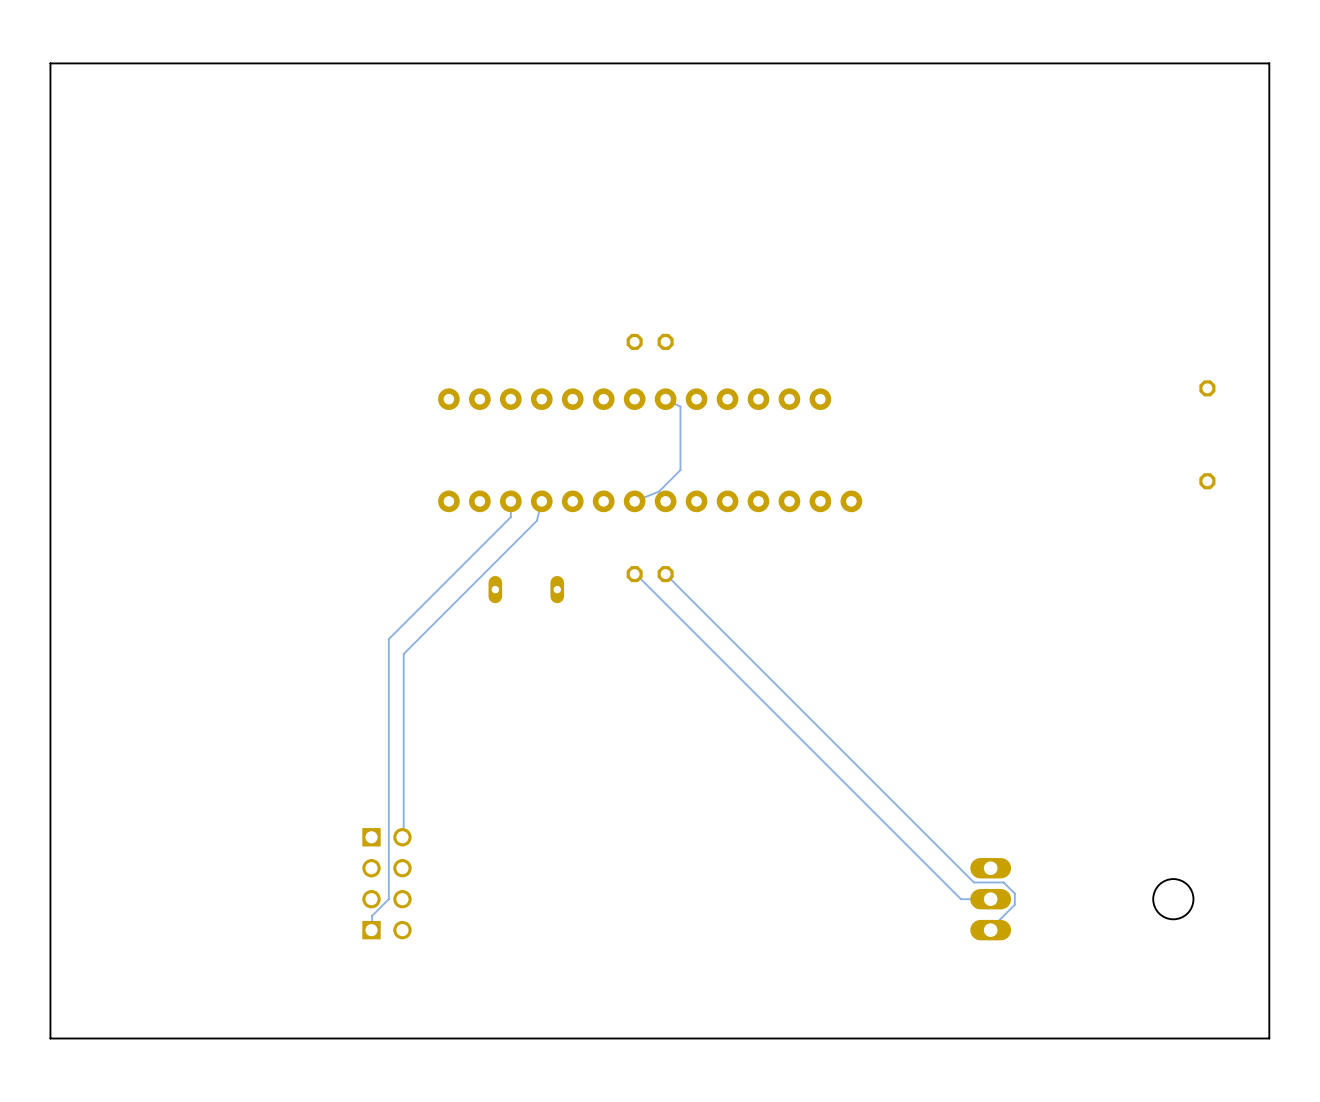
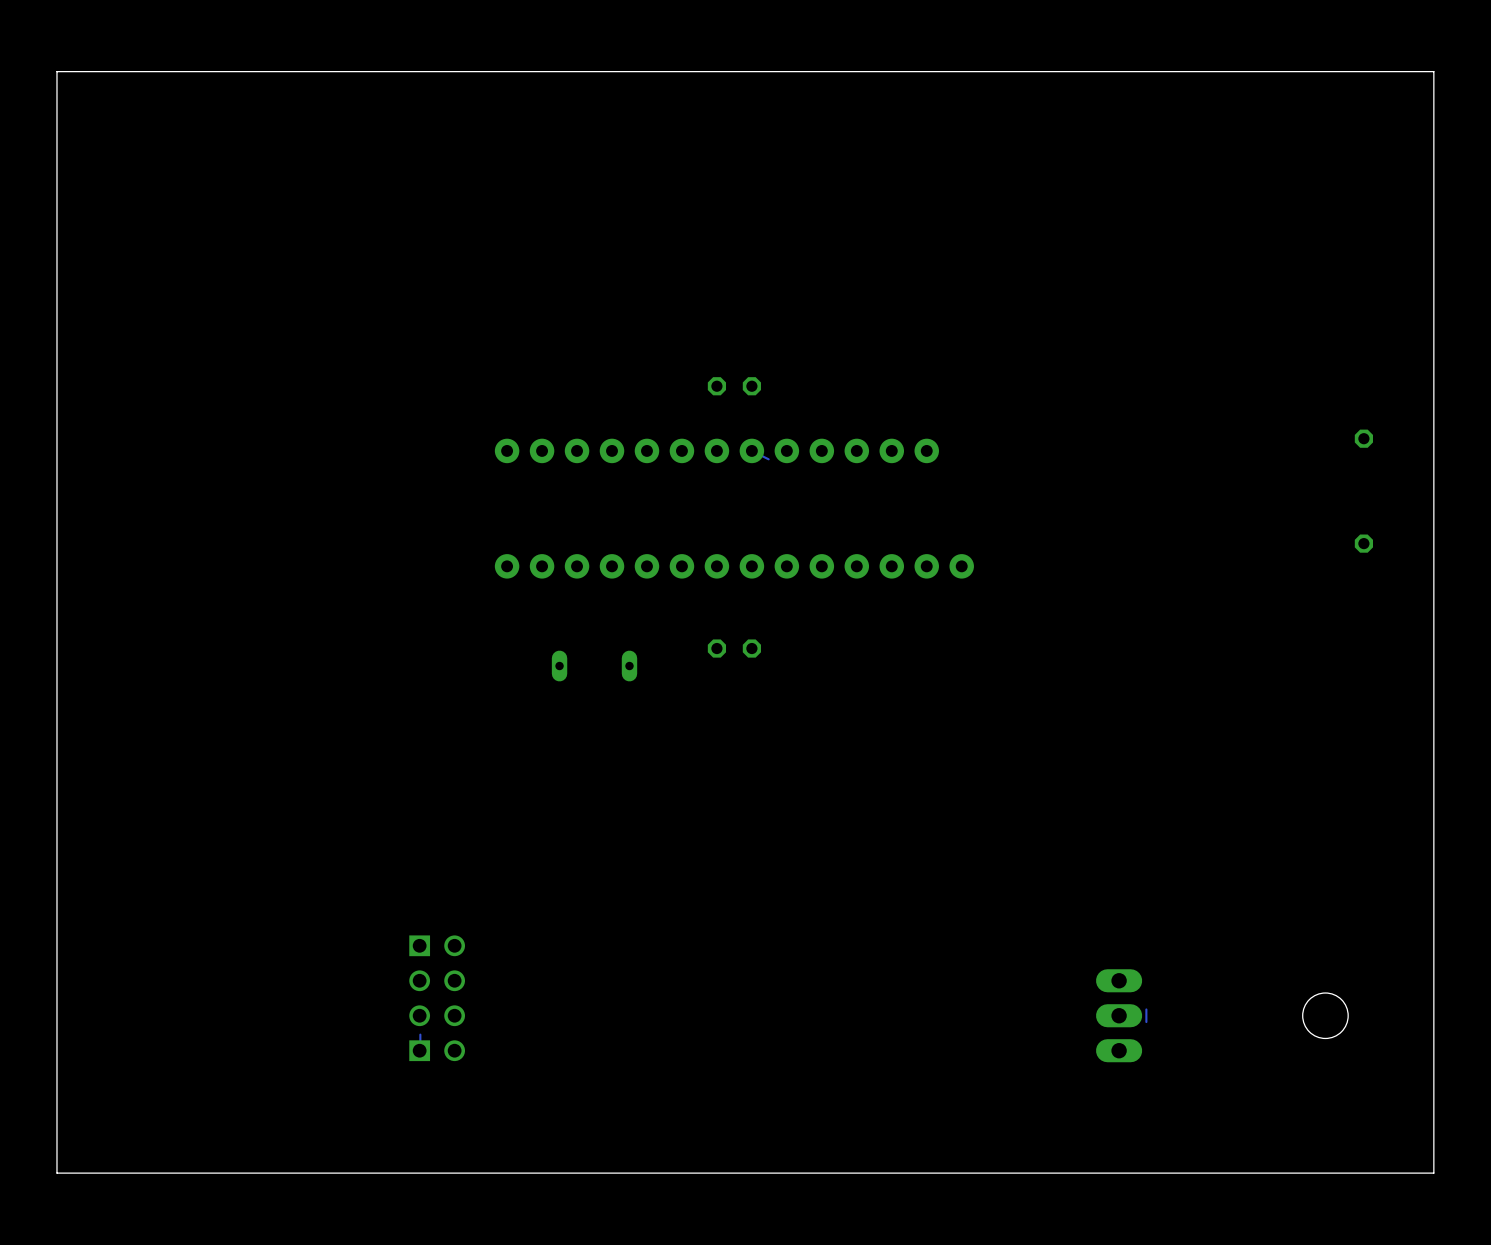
track: (680, 406) (680, 470) (658, 491) (634, 501) -> none
track: (510, 501) (510, 517) (388, 639) (388, 899) (372, 915) -> none
track: (541, 501) (536, 520) (403, 653) (403, 836) -> none
track: (634, 574) (960, 899) (990, 899) -> none
track: (665, 574) (973, 882) (1003, 882) (1014, 893) -> none
track: (1014, 904) (990, 928) -> none

